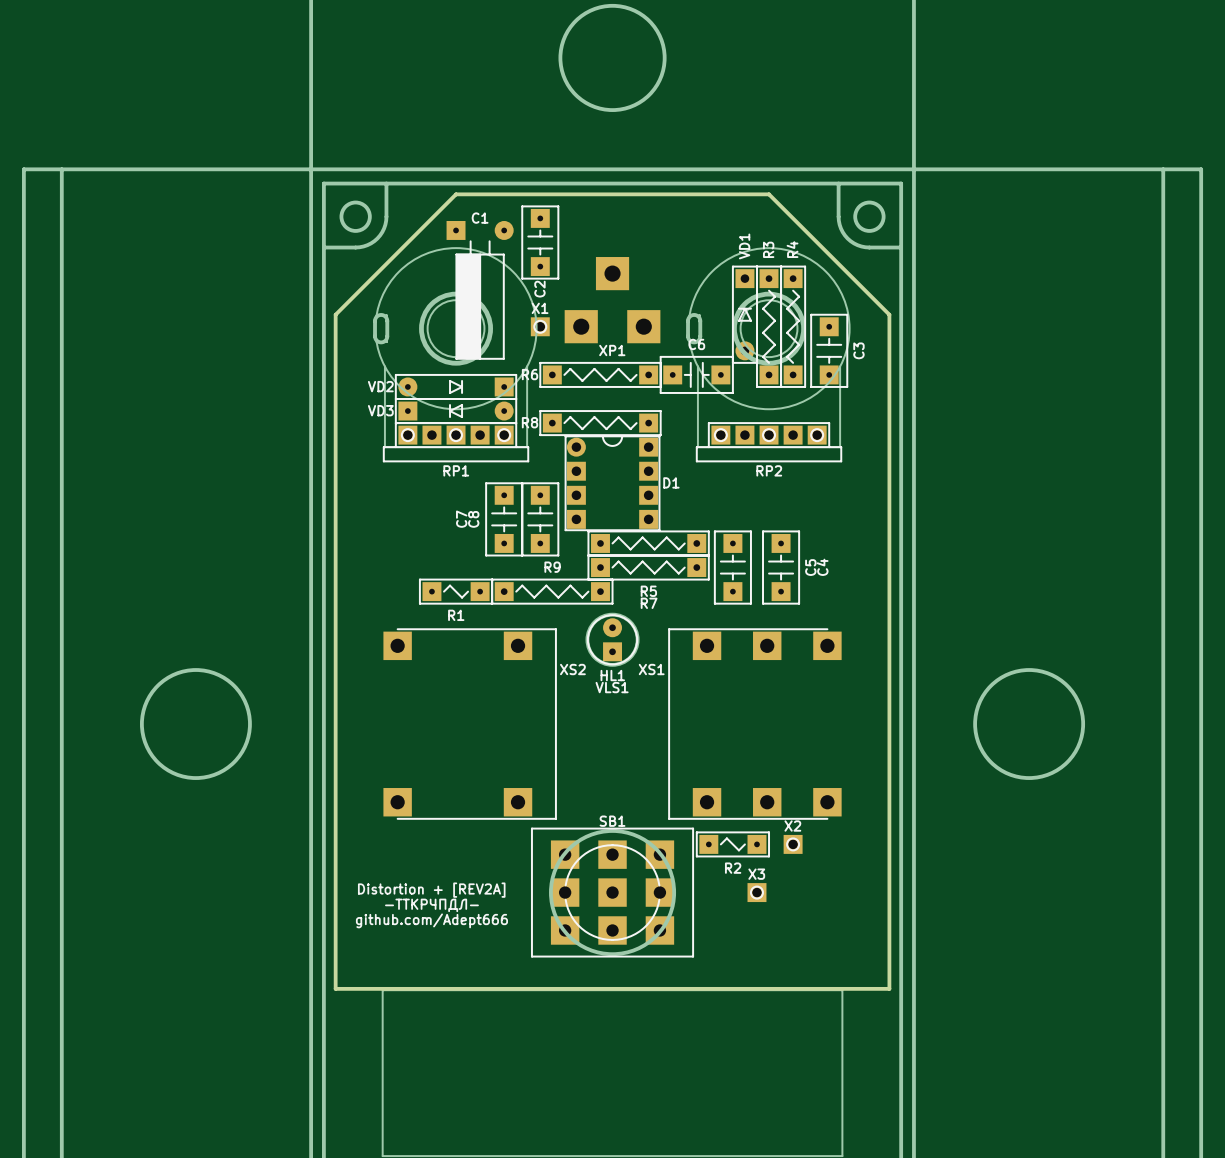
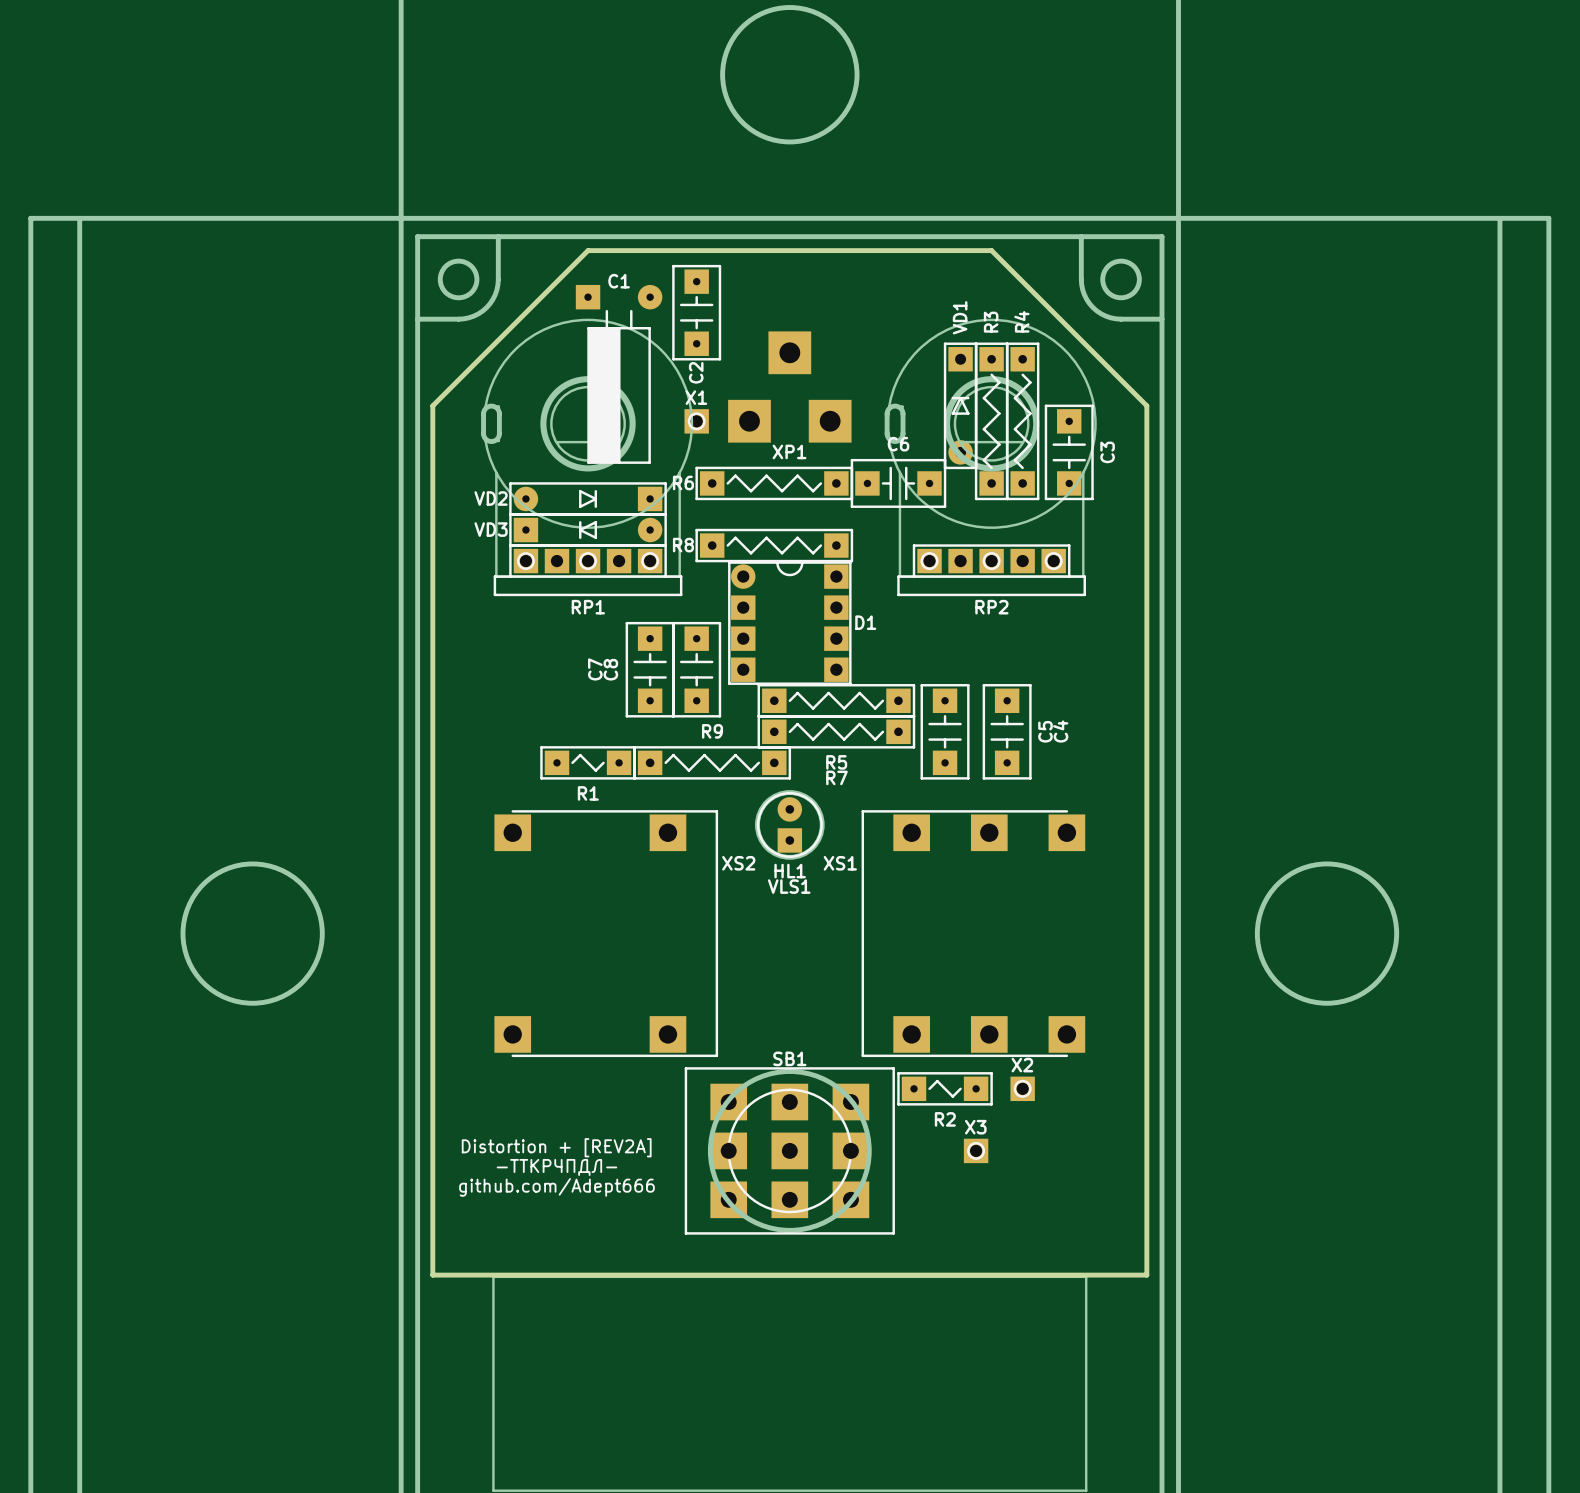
RP1 footprint: [373, 247, 538, 463] -> [481, 318, 694, 597]
RP2 footprint: [686, 247, 851, 463] -> [884, 318, 1097, 597]

